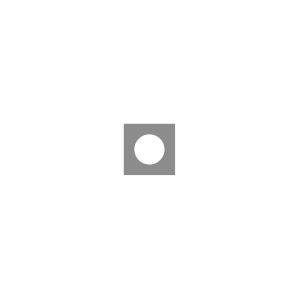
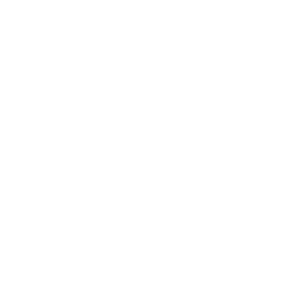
part: (149, 149) -> none

